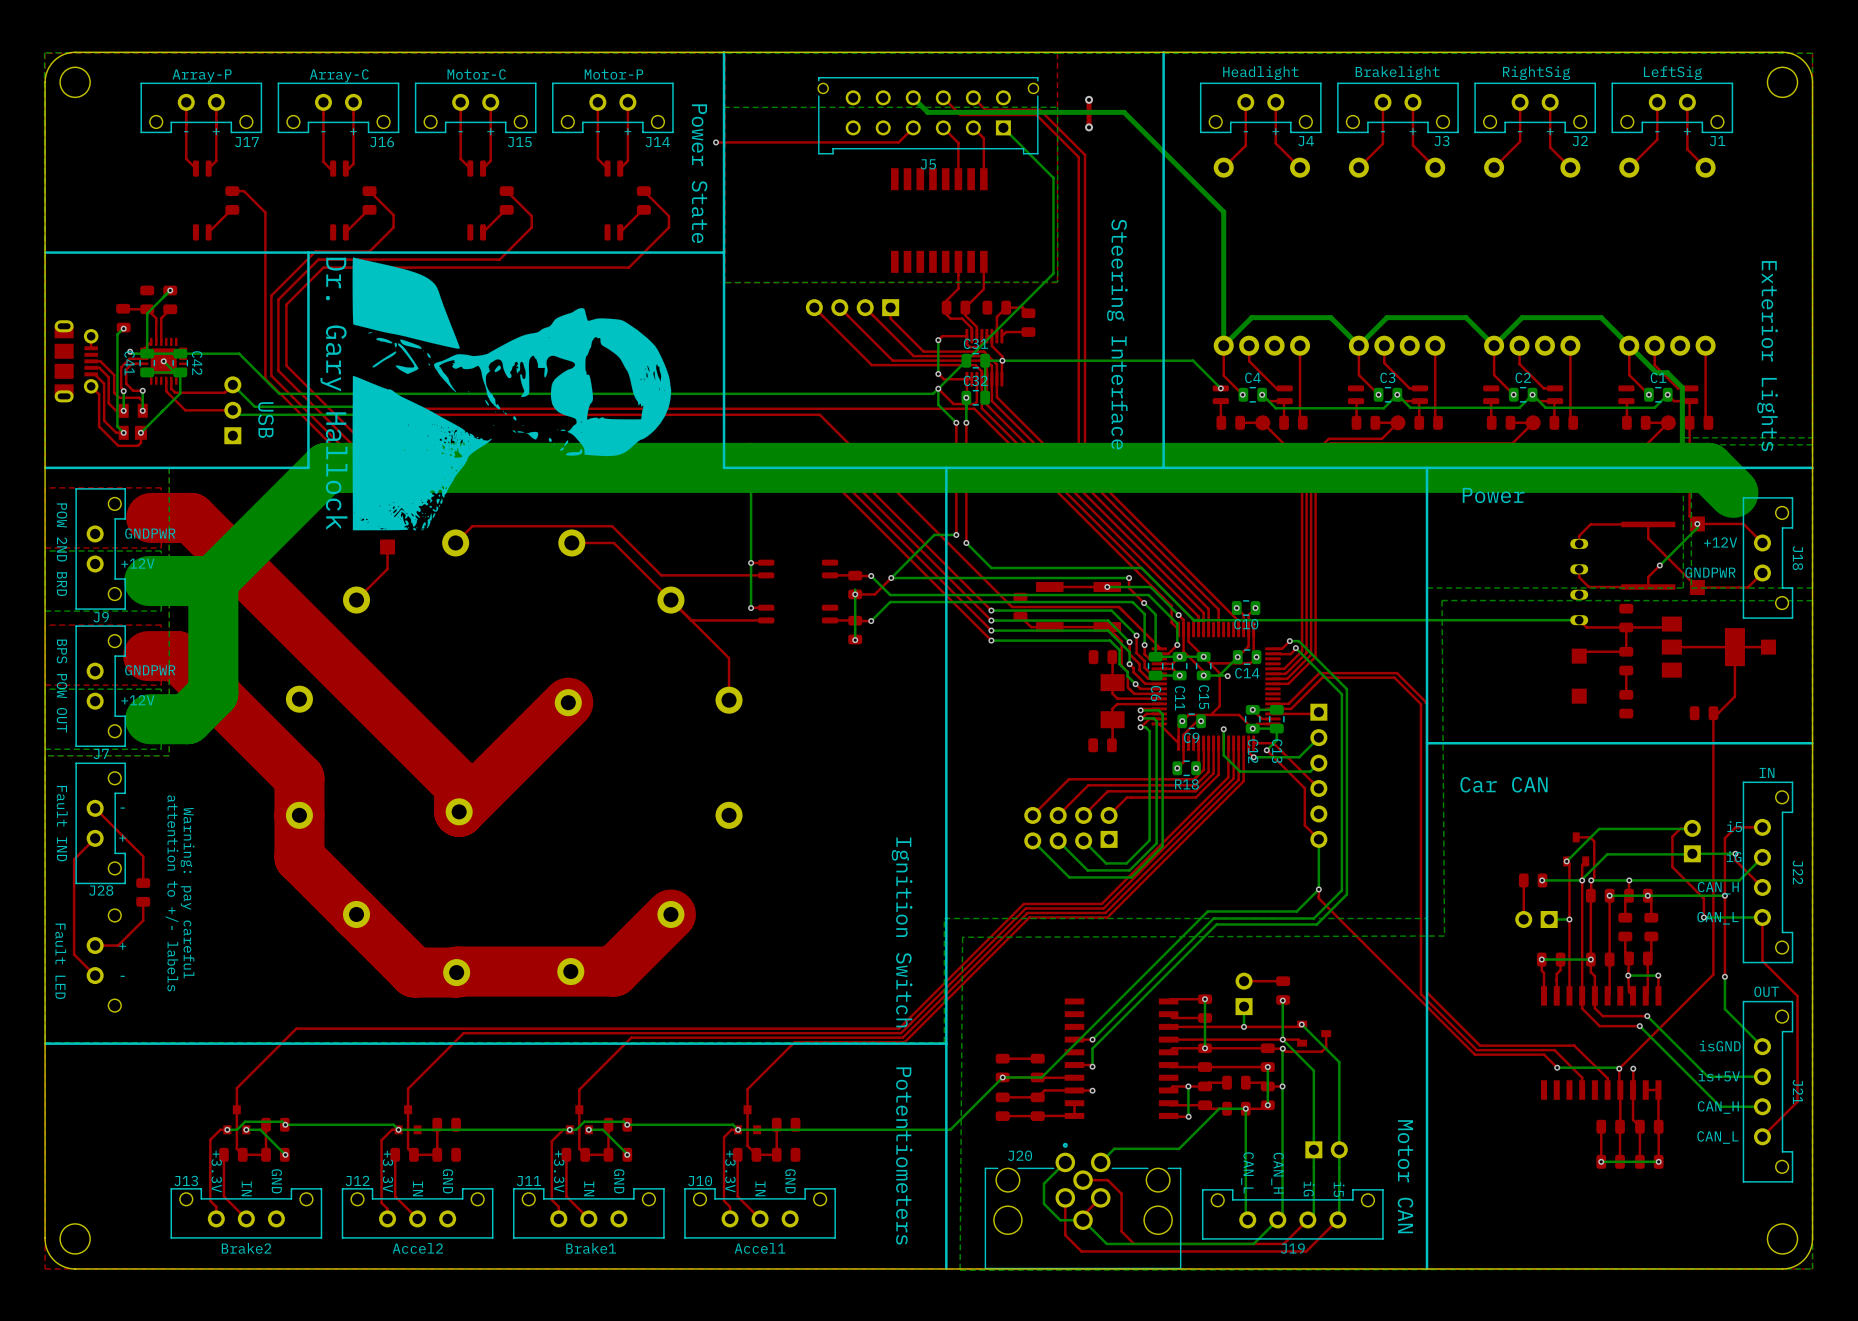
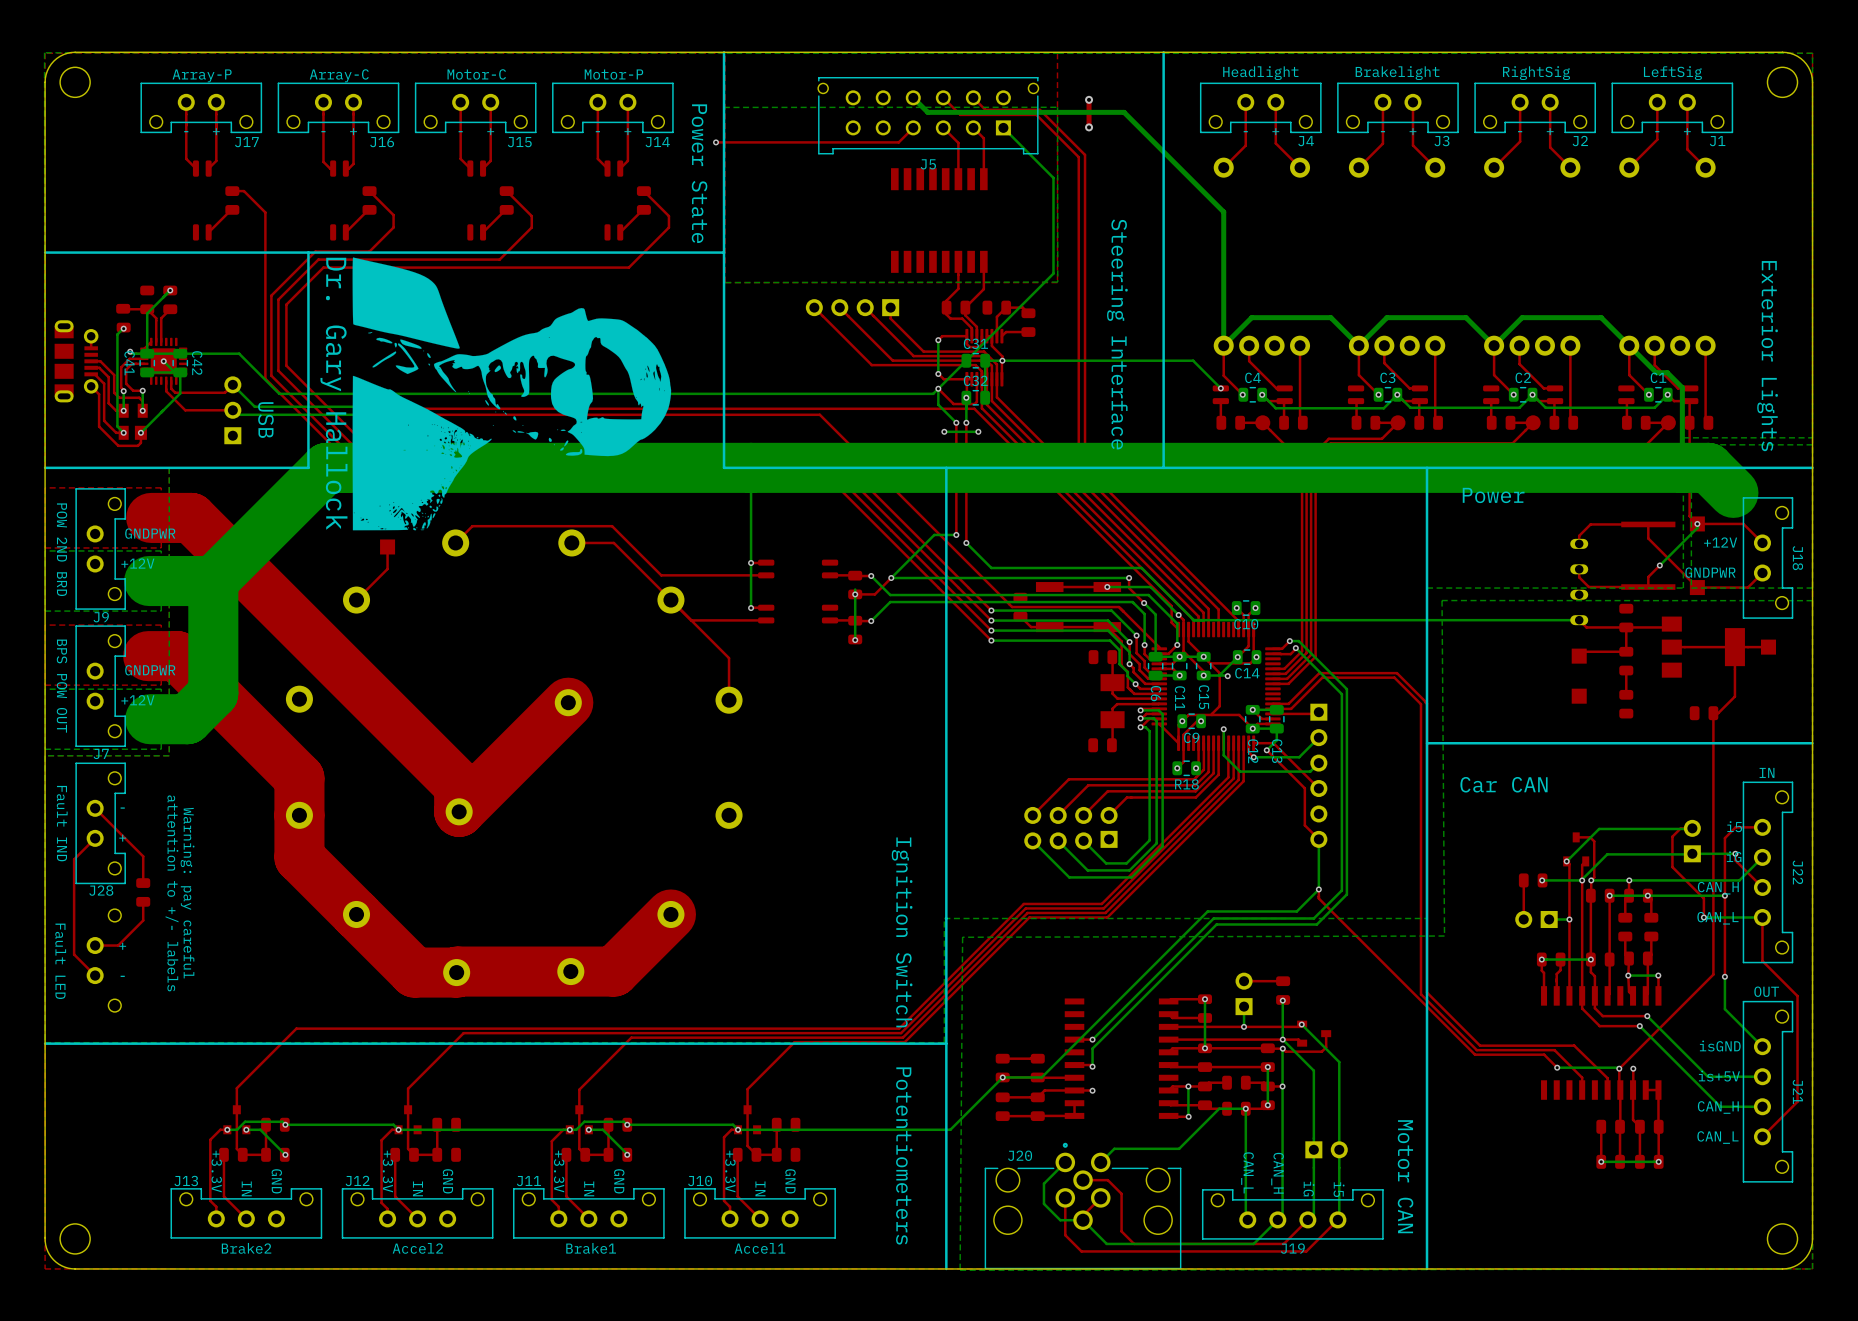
via: none -> (944, 431)
bottom track: none -> (978, 431) (944, 431)
via: none -> (978, 431)

